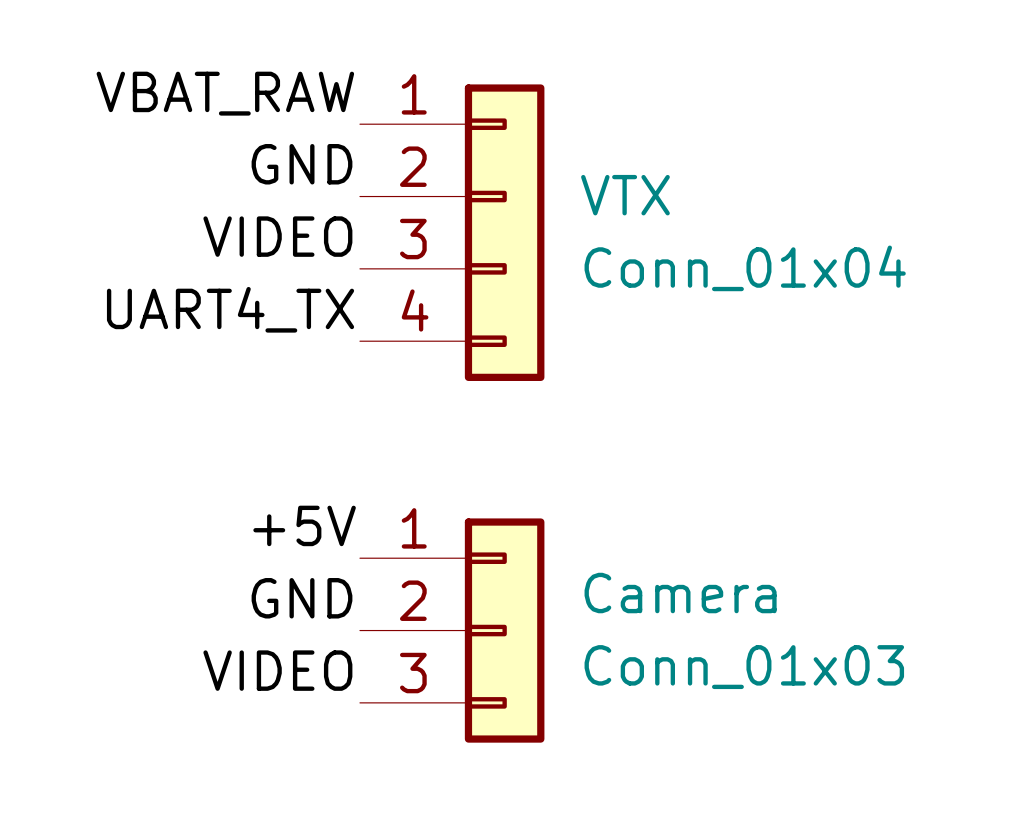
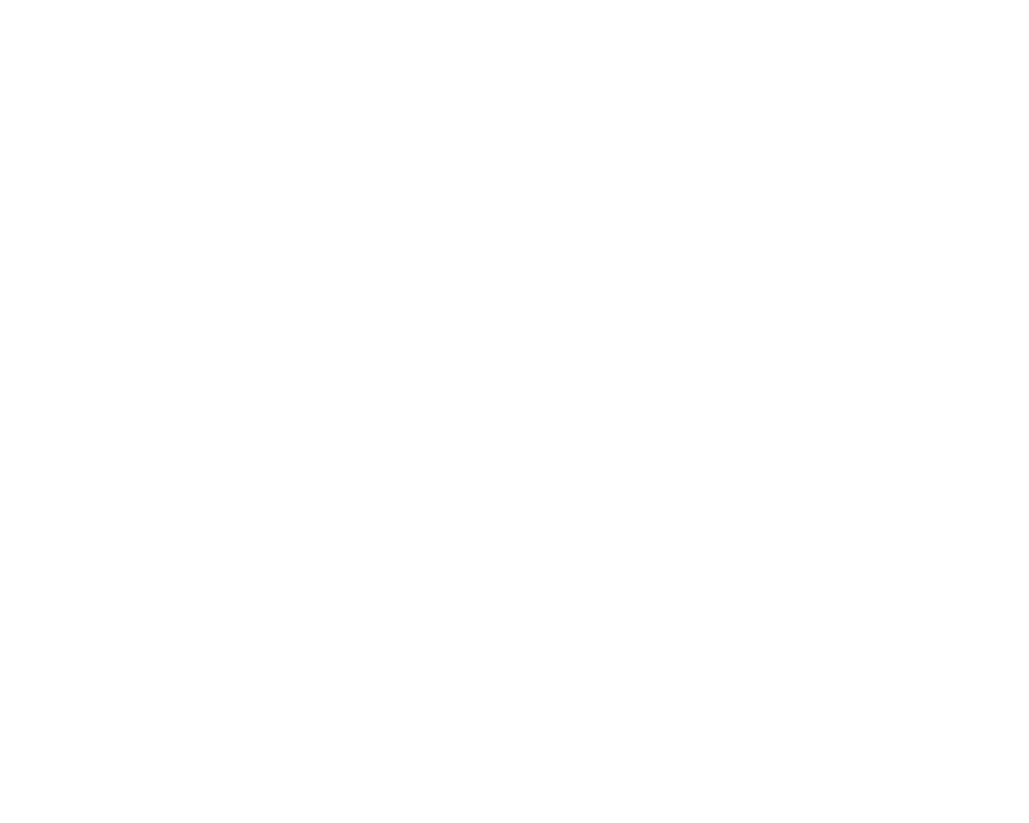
label: VBAT_RAW (225, 93) -> none
label: GND (301, 164) -> none
VTX: Conn_01x04 (452, 232) -> none
label: VIDEO (277, 236) -> none
label: UART4_TX (230, 309) -> none
label: +5V (304, 525) -> none
label: GND (301, 598) -> none
Camera: Conn_01x03 (452, 630) -> none
label: VIDEO (277, 670) -> none

